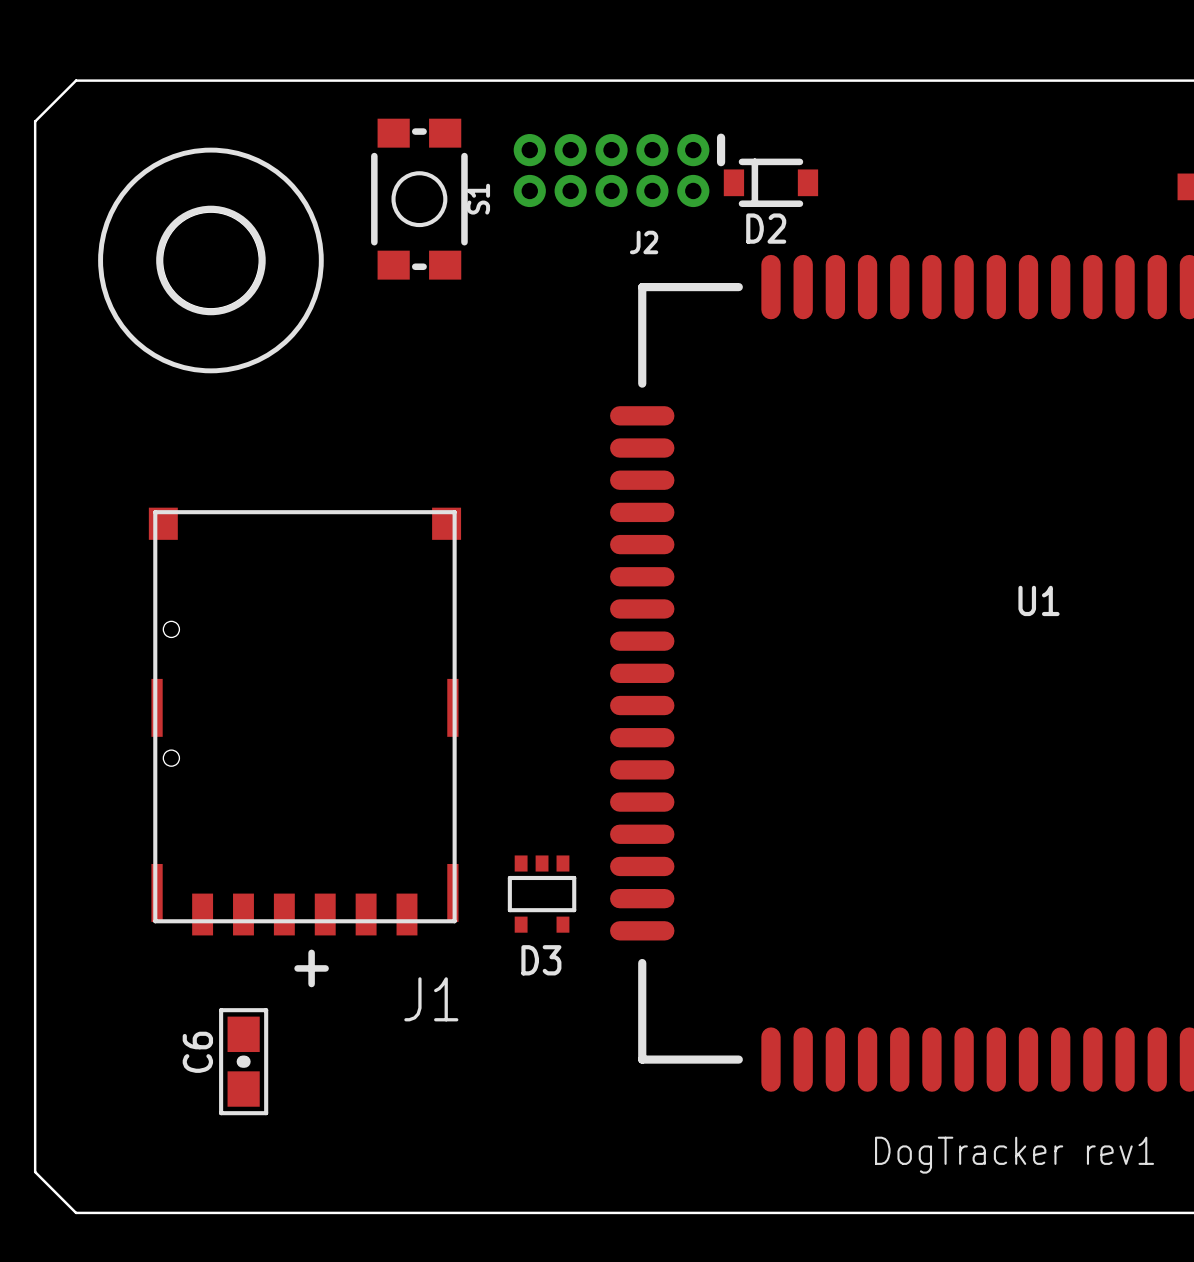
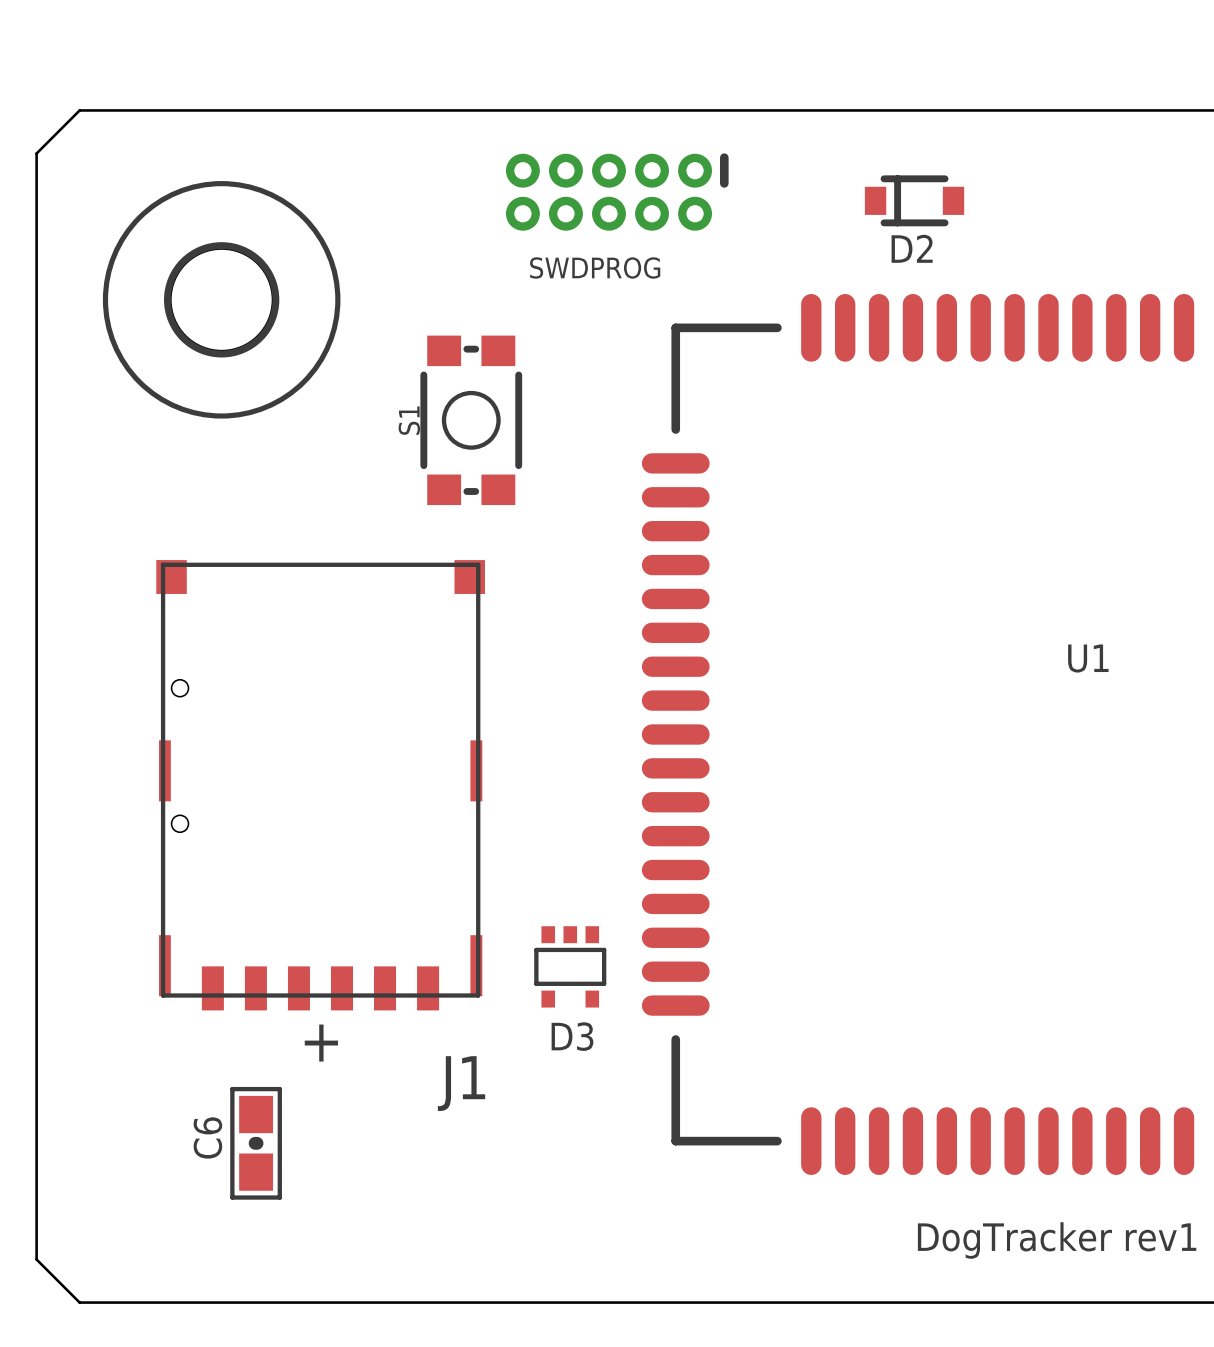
SWDPROG: none -> (617, 192)
J2: (619, 170) -> none
D2 position: (770, 182) -> (914, 200)
S1 position: (419, 199) -> (471, 420)
S1 name position: S1 (478, 199) -> S1 (409, 420)

